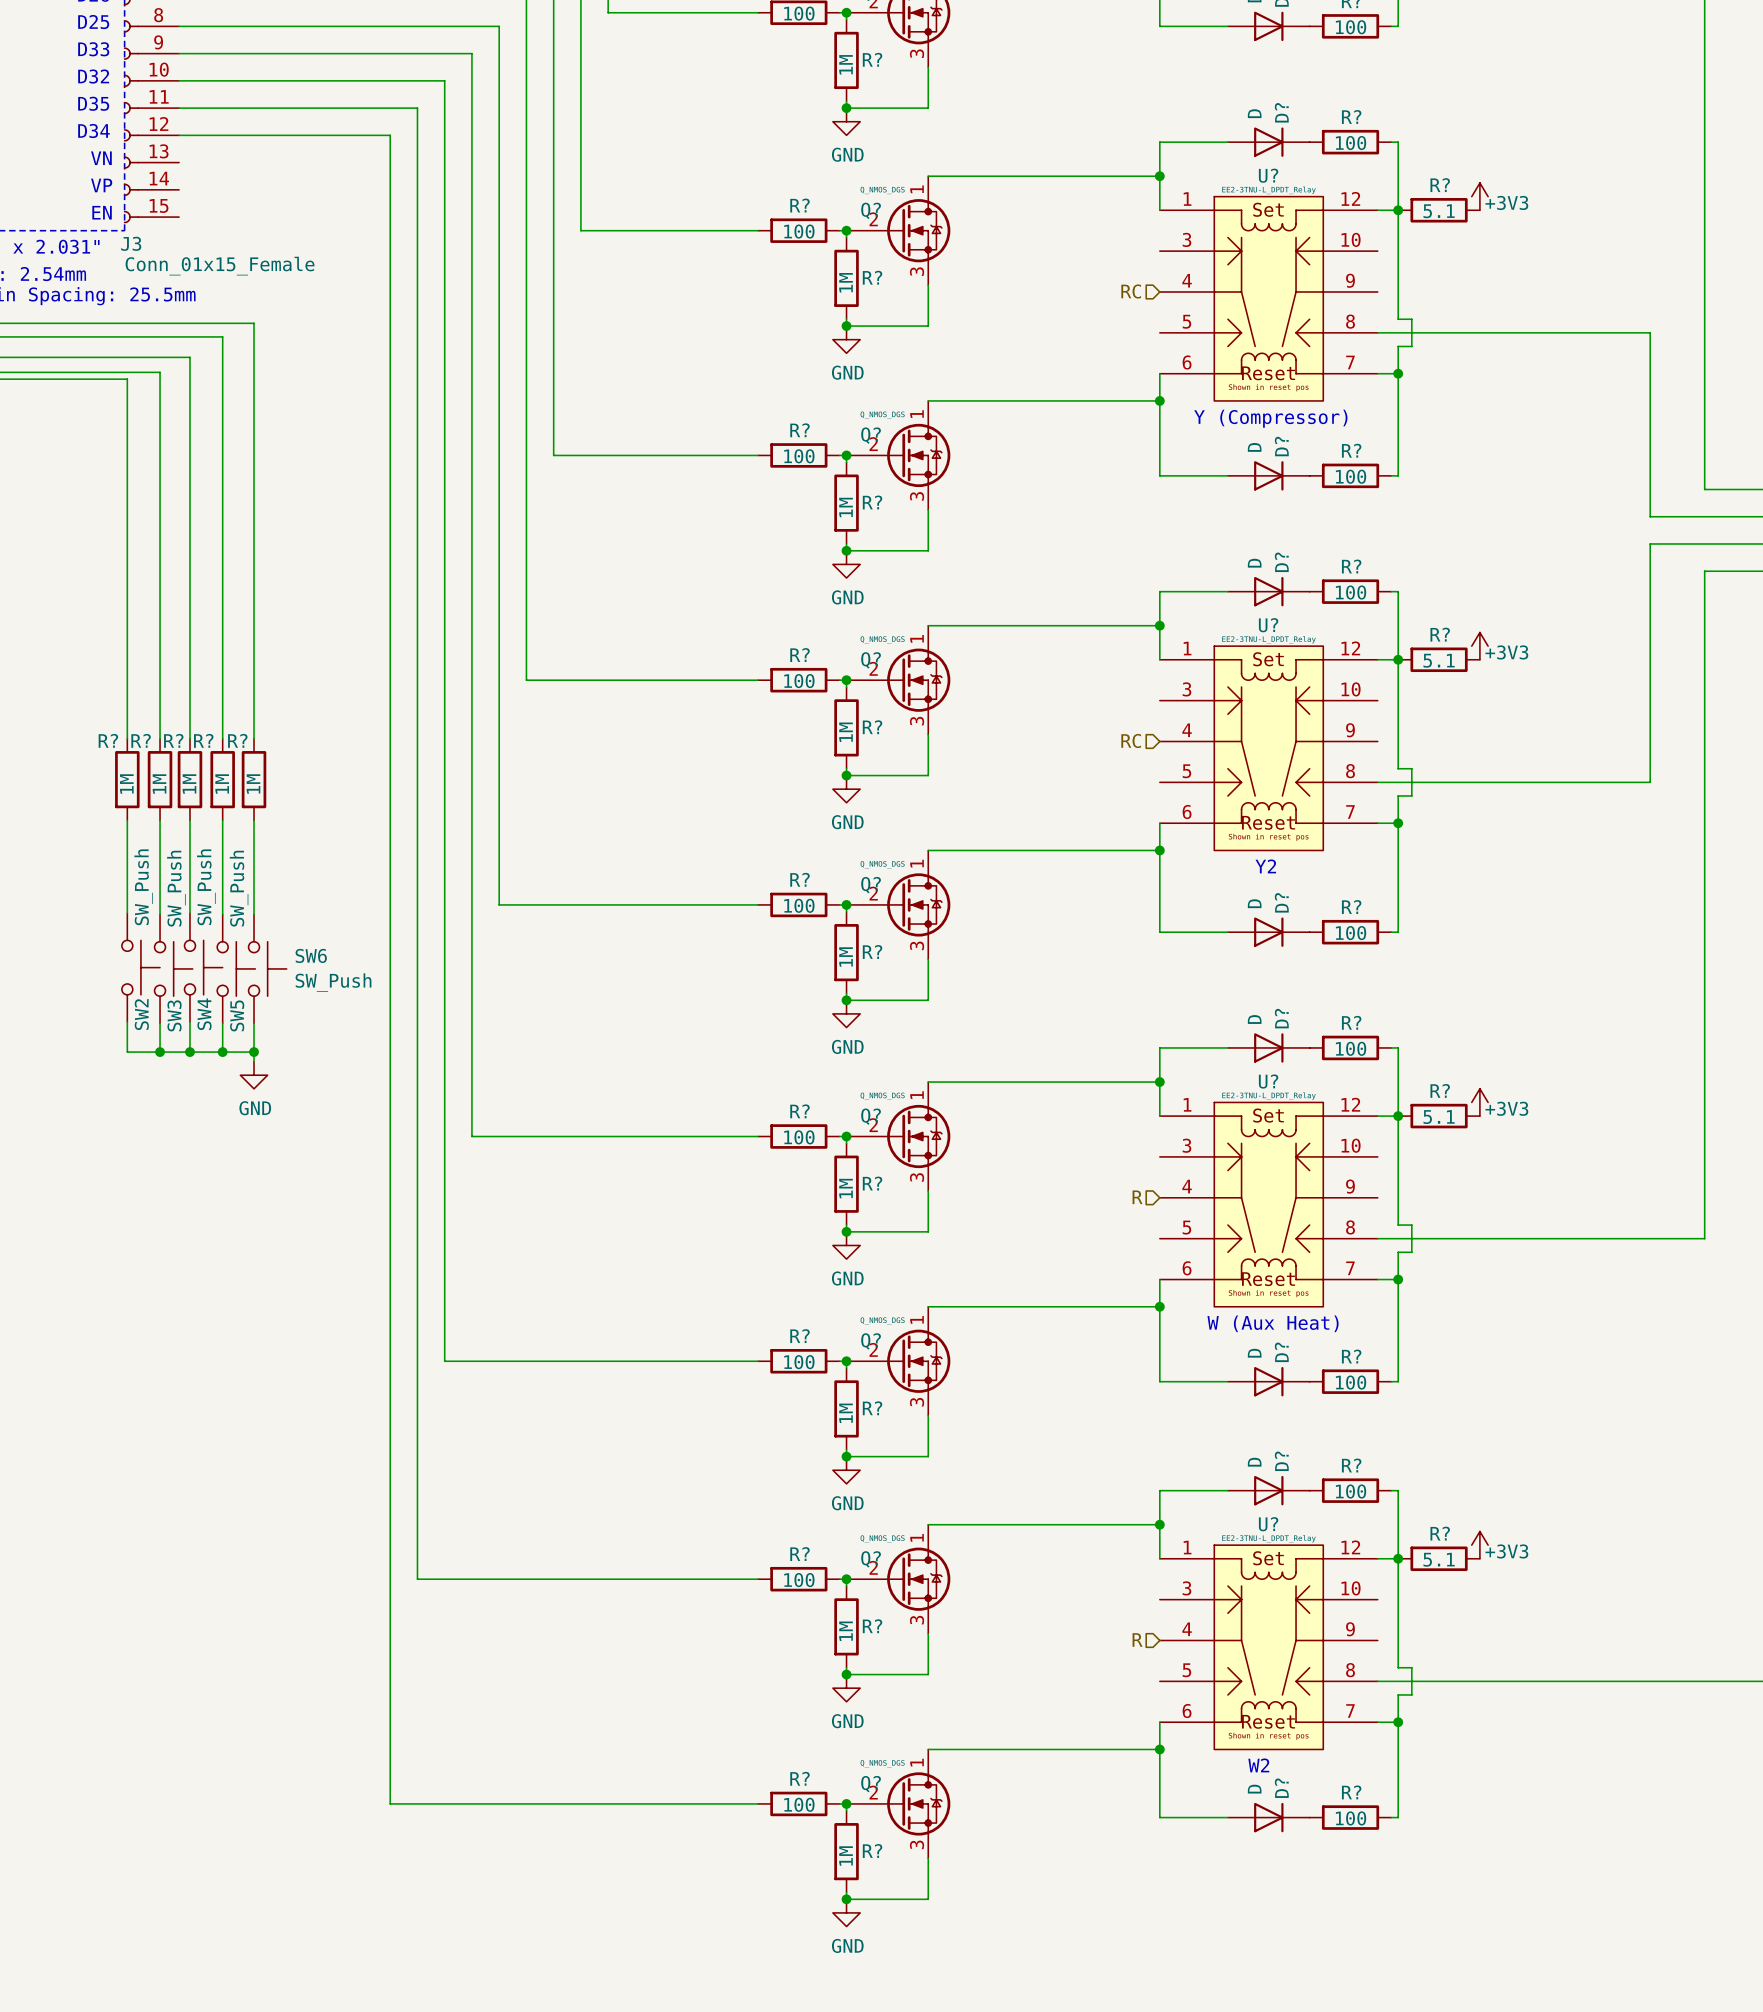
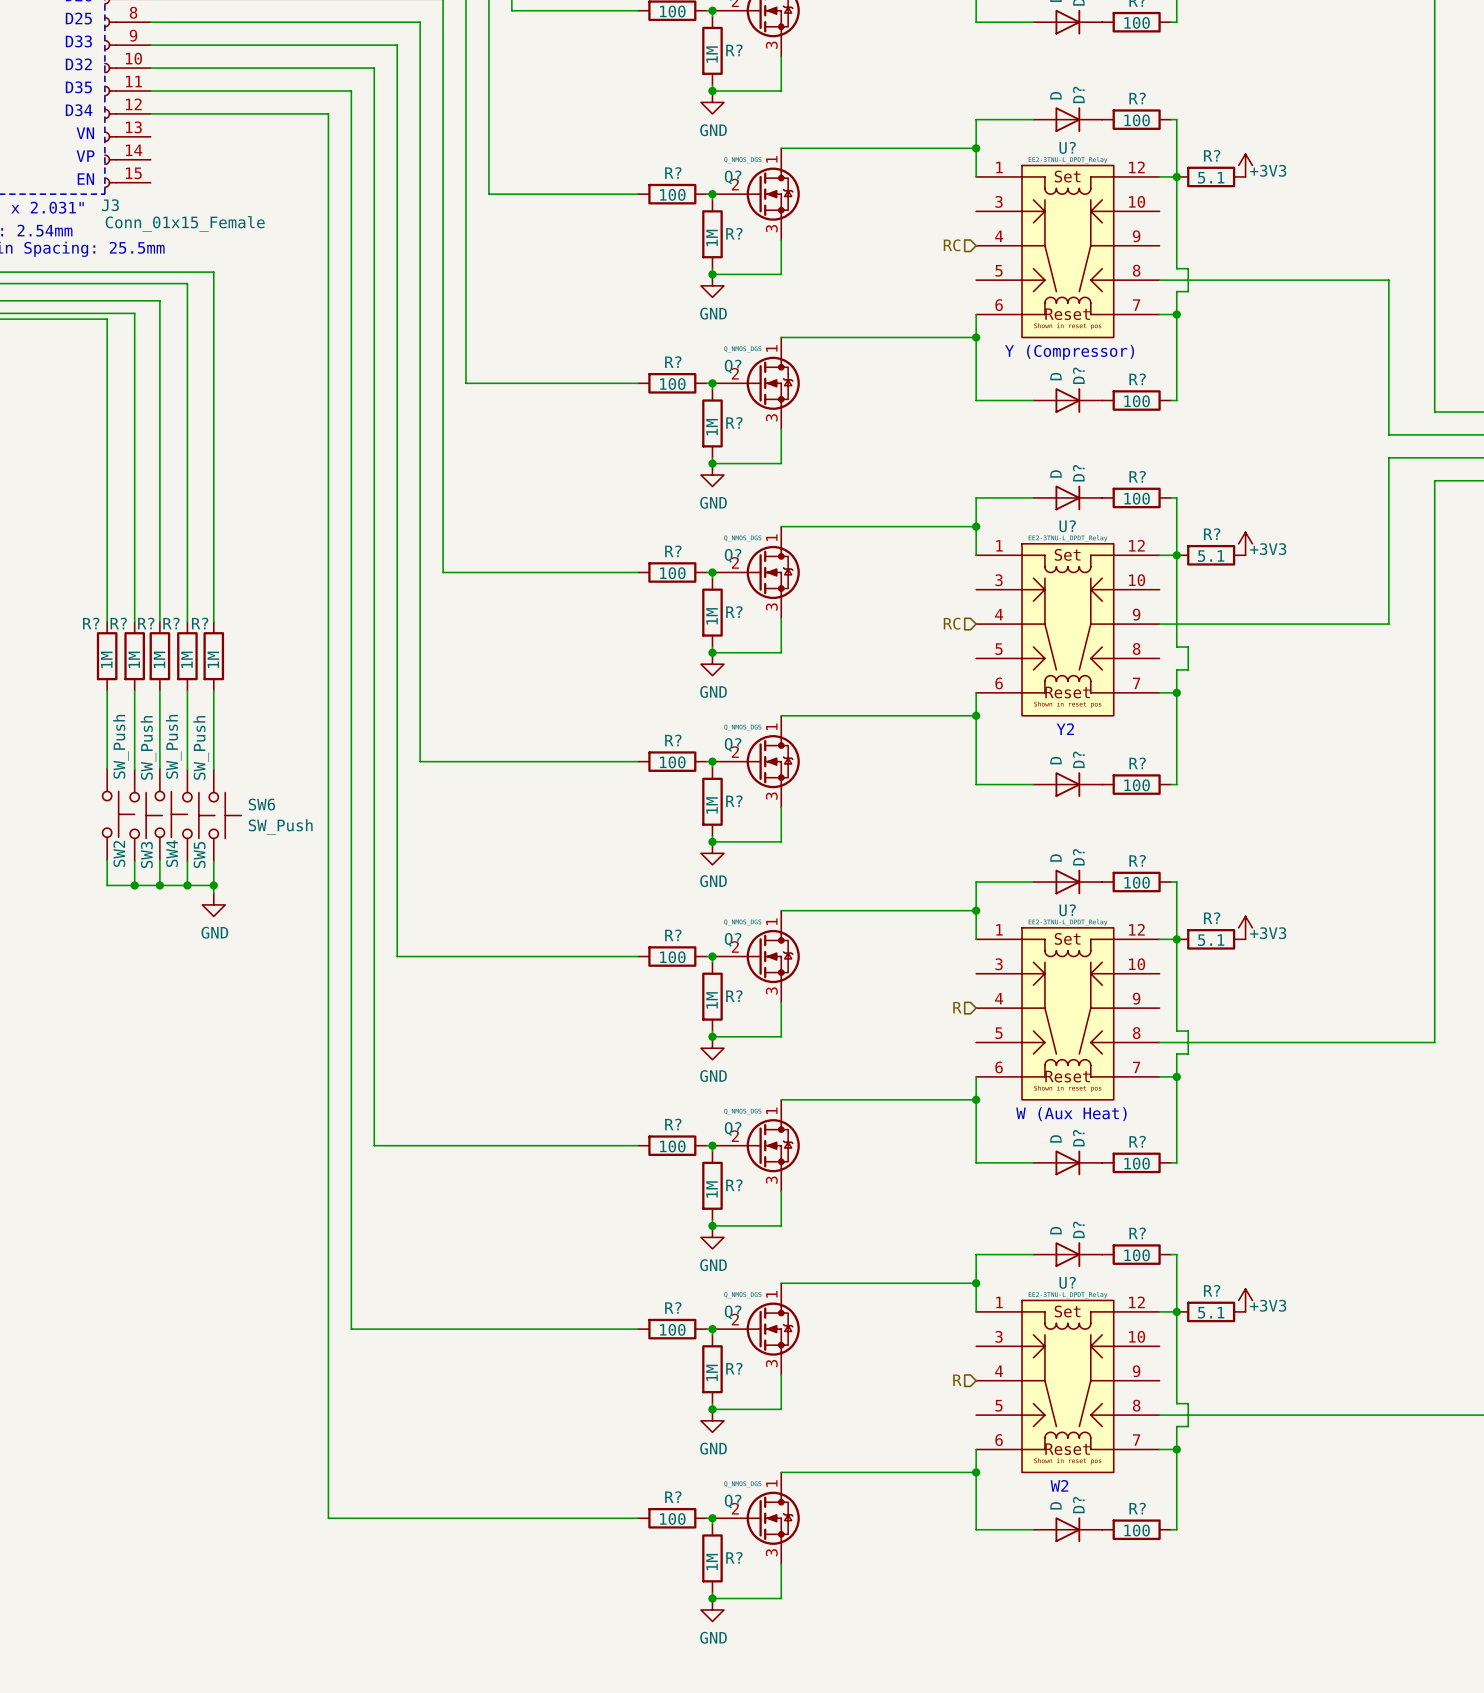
wire: (1650, 741) (1650, 782) (1377, 782) -> (1388, 624) (1159, 624)

